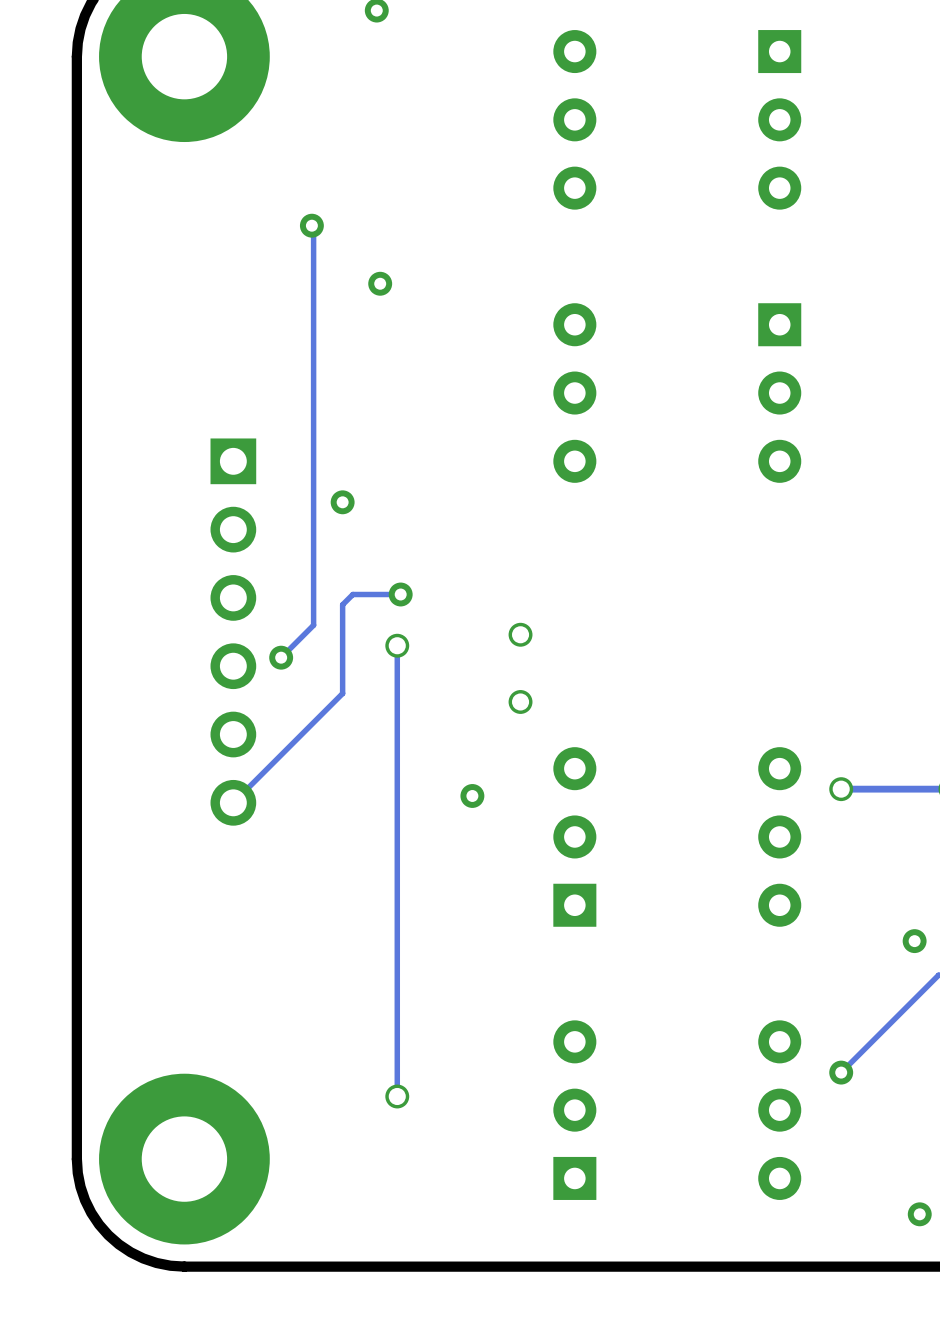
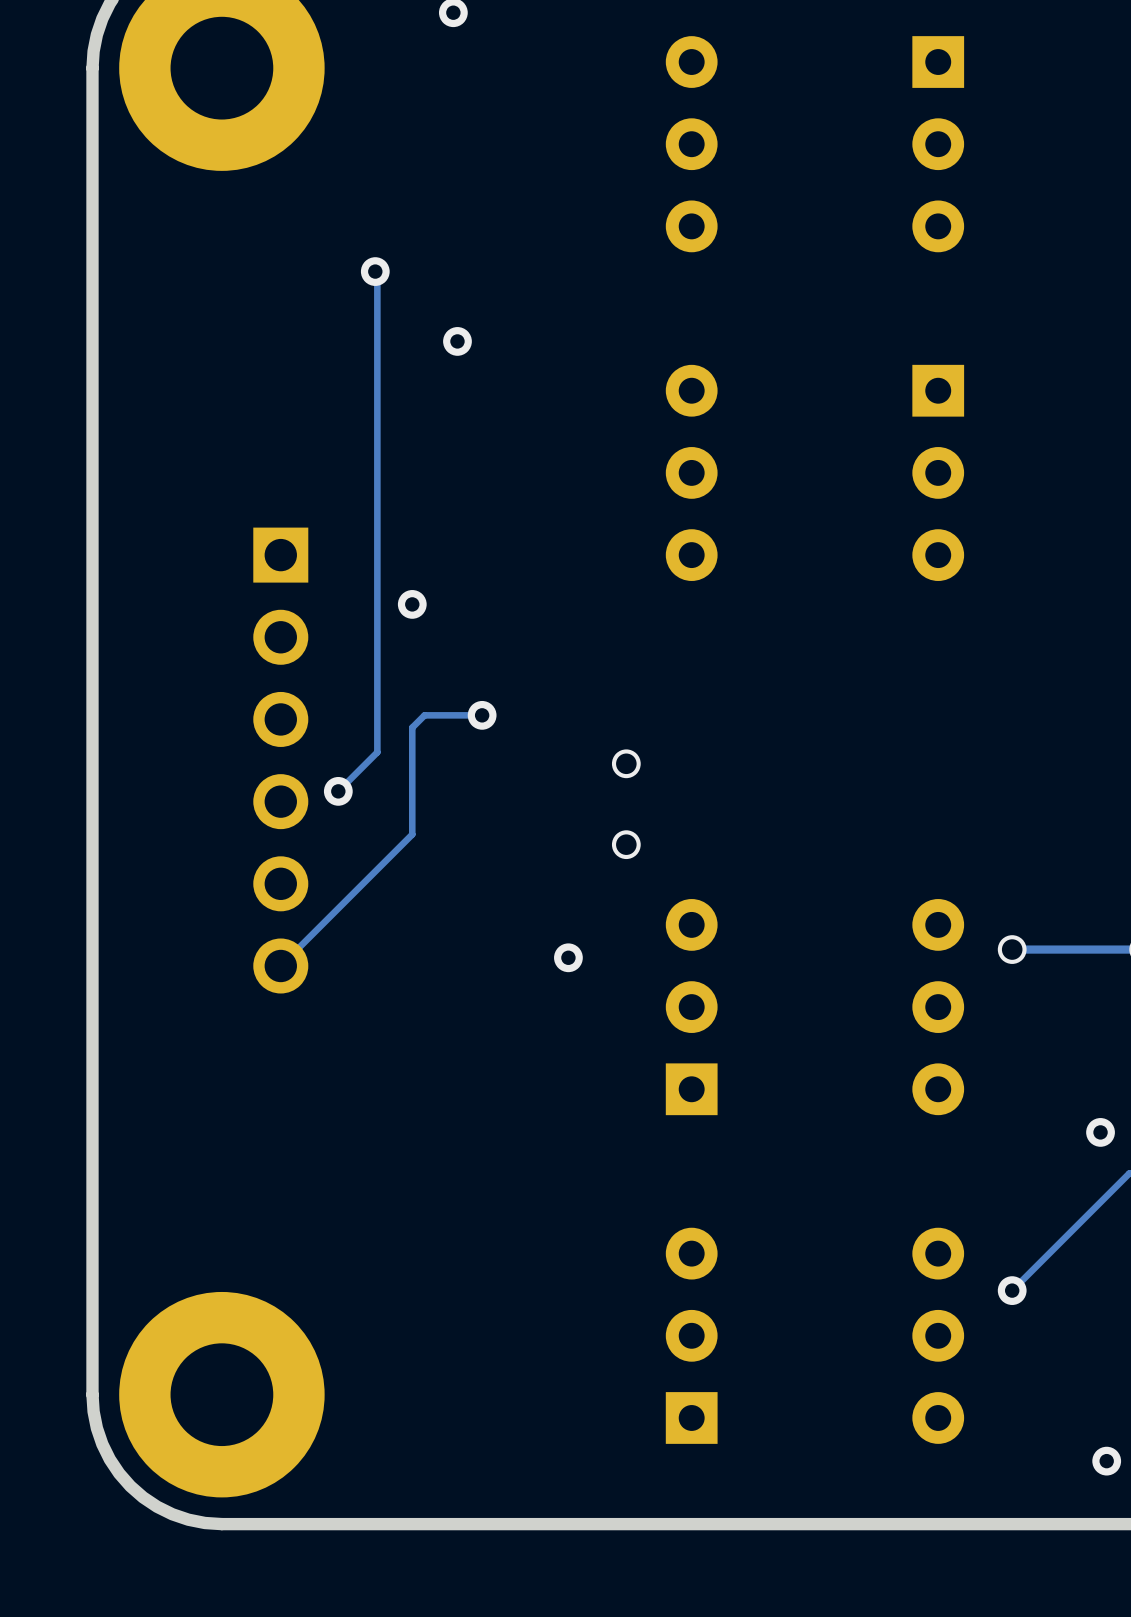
track: (397, 645) (397, 1096) -> none
via: (397, 645) -> none
via: (397, 1096) -> none

